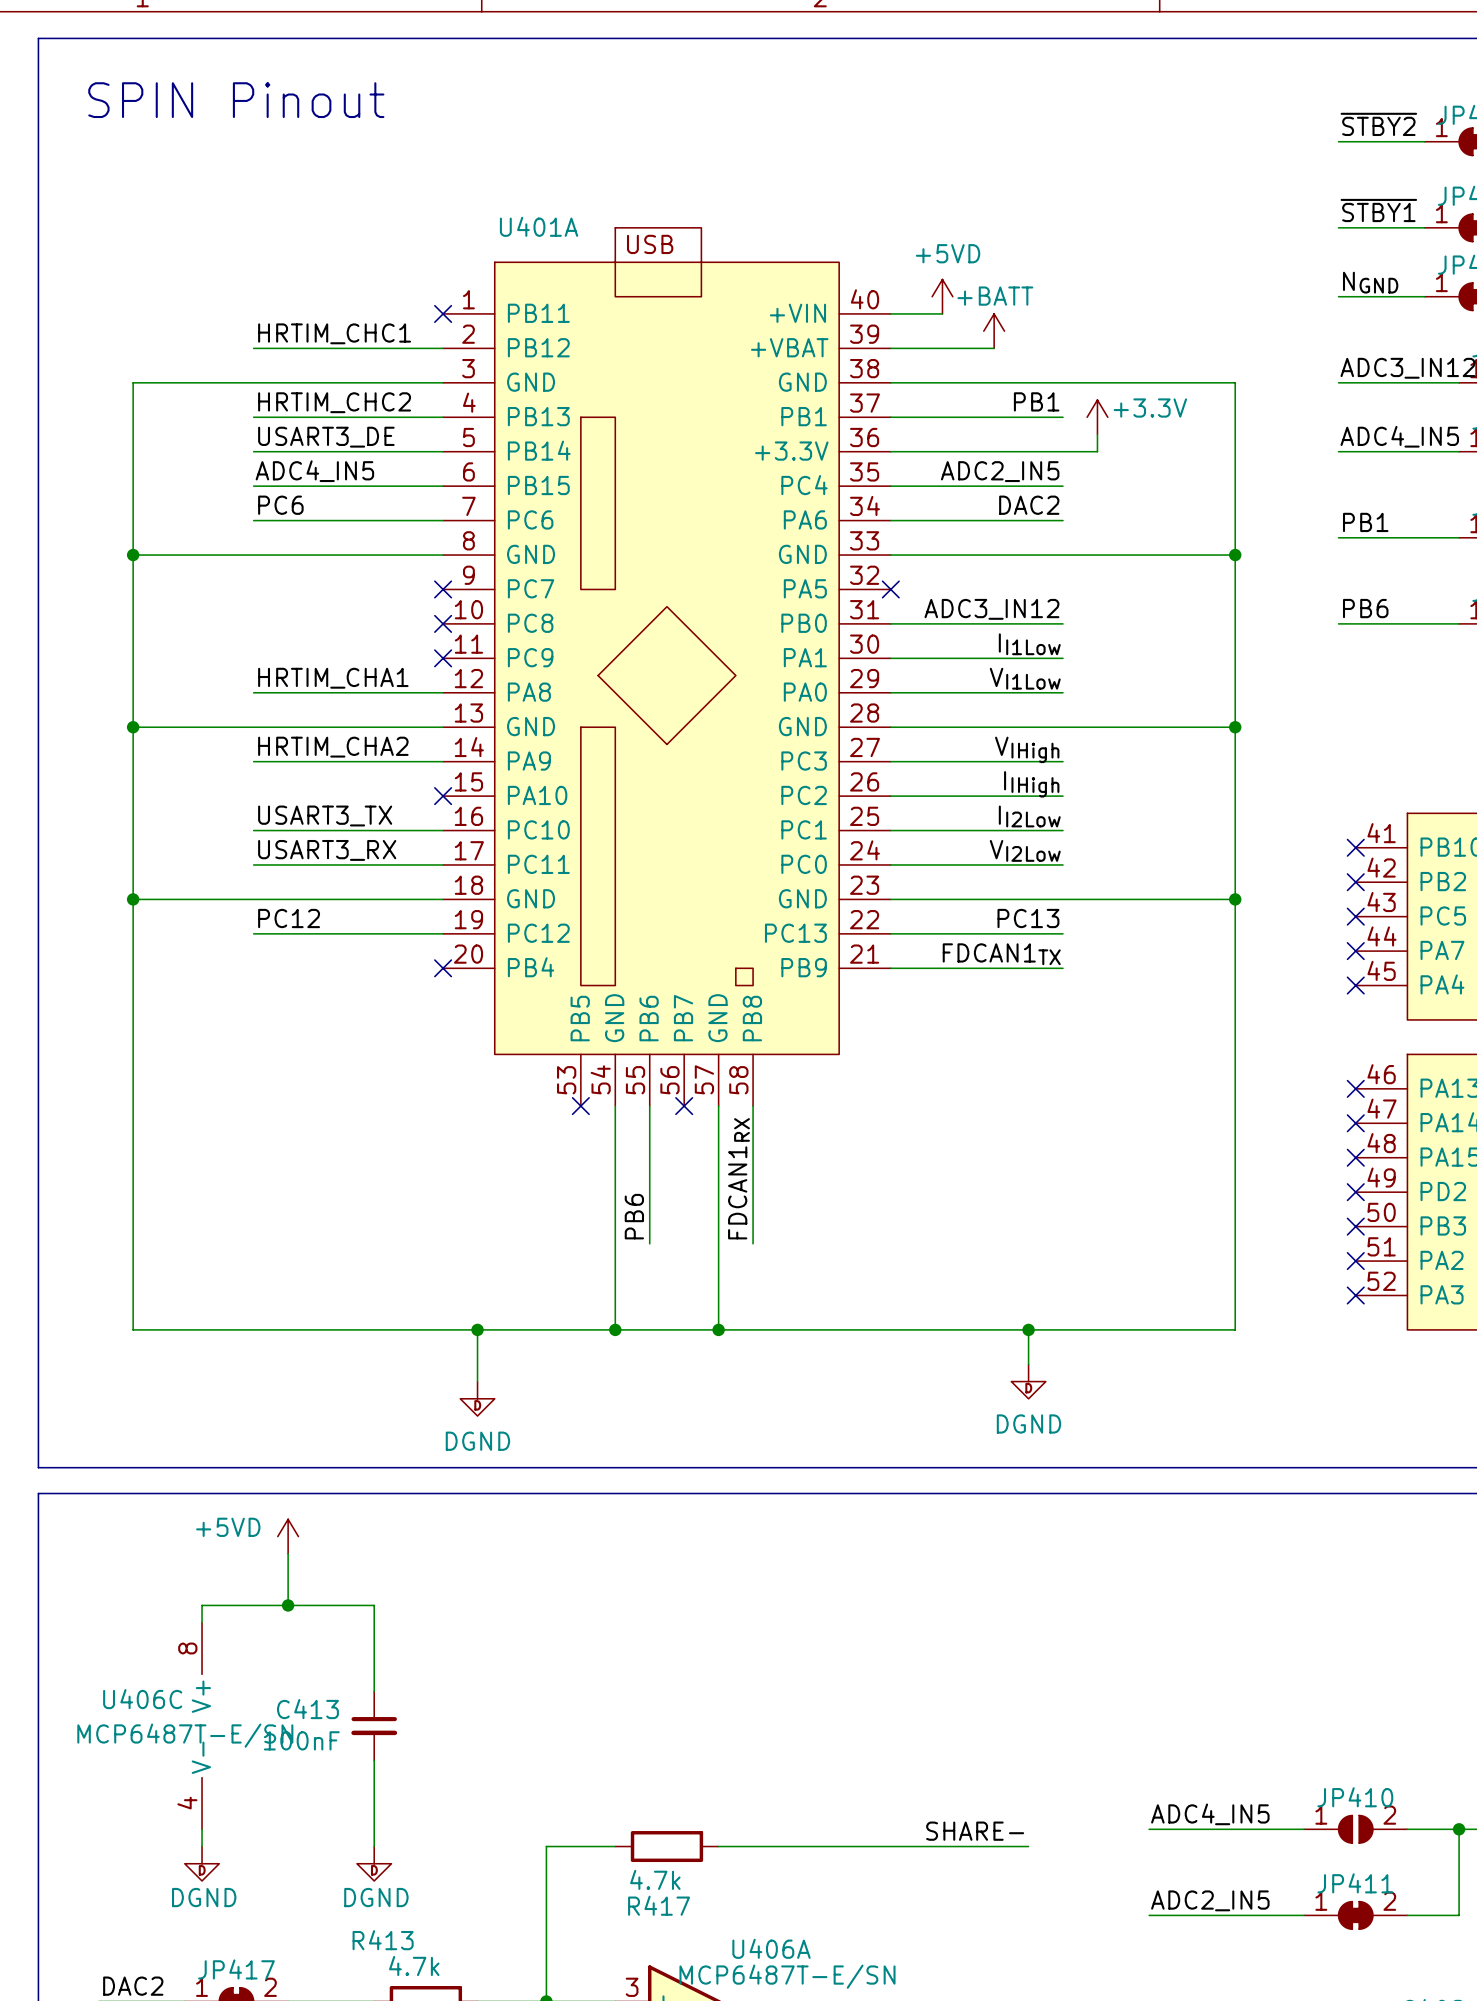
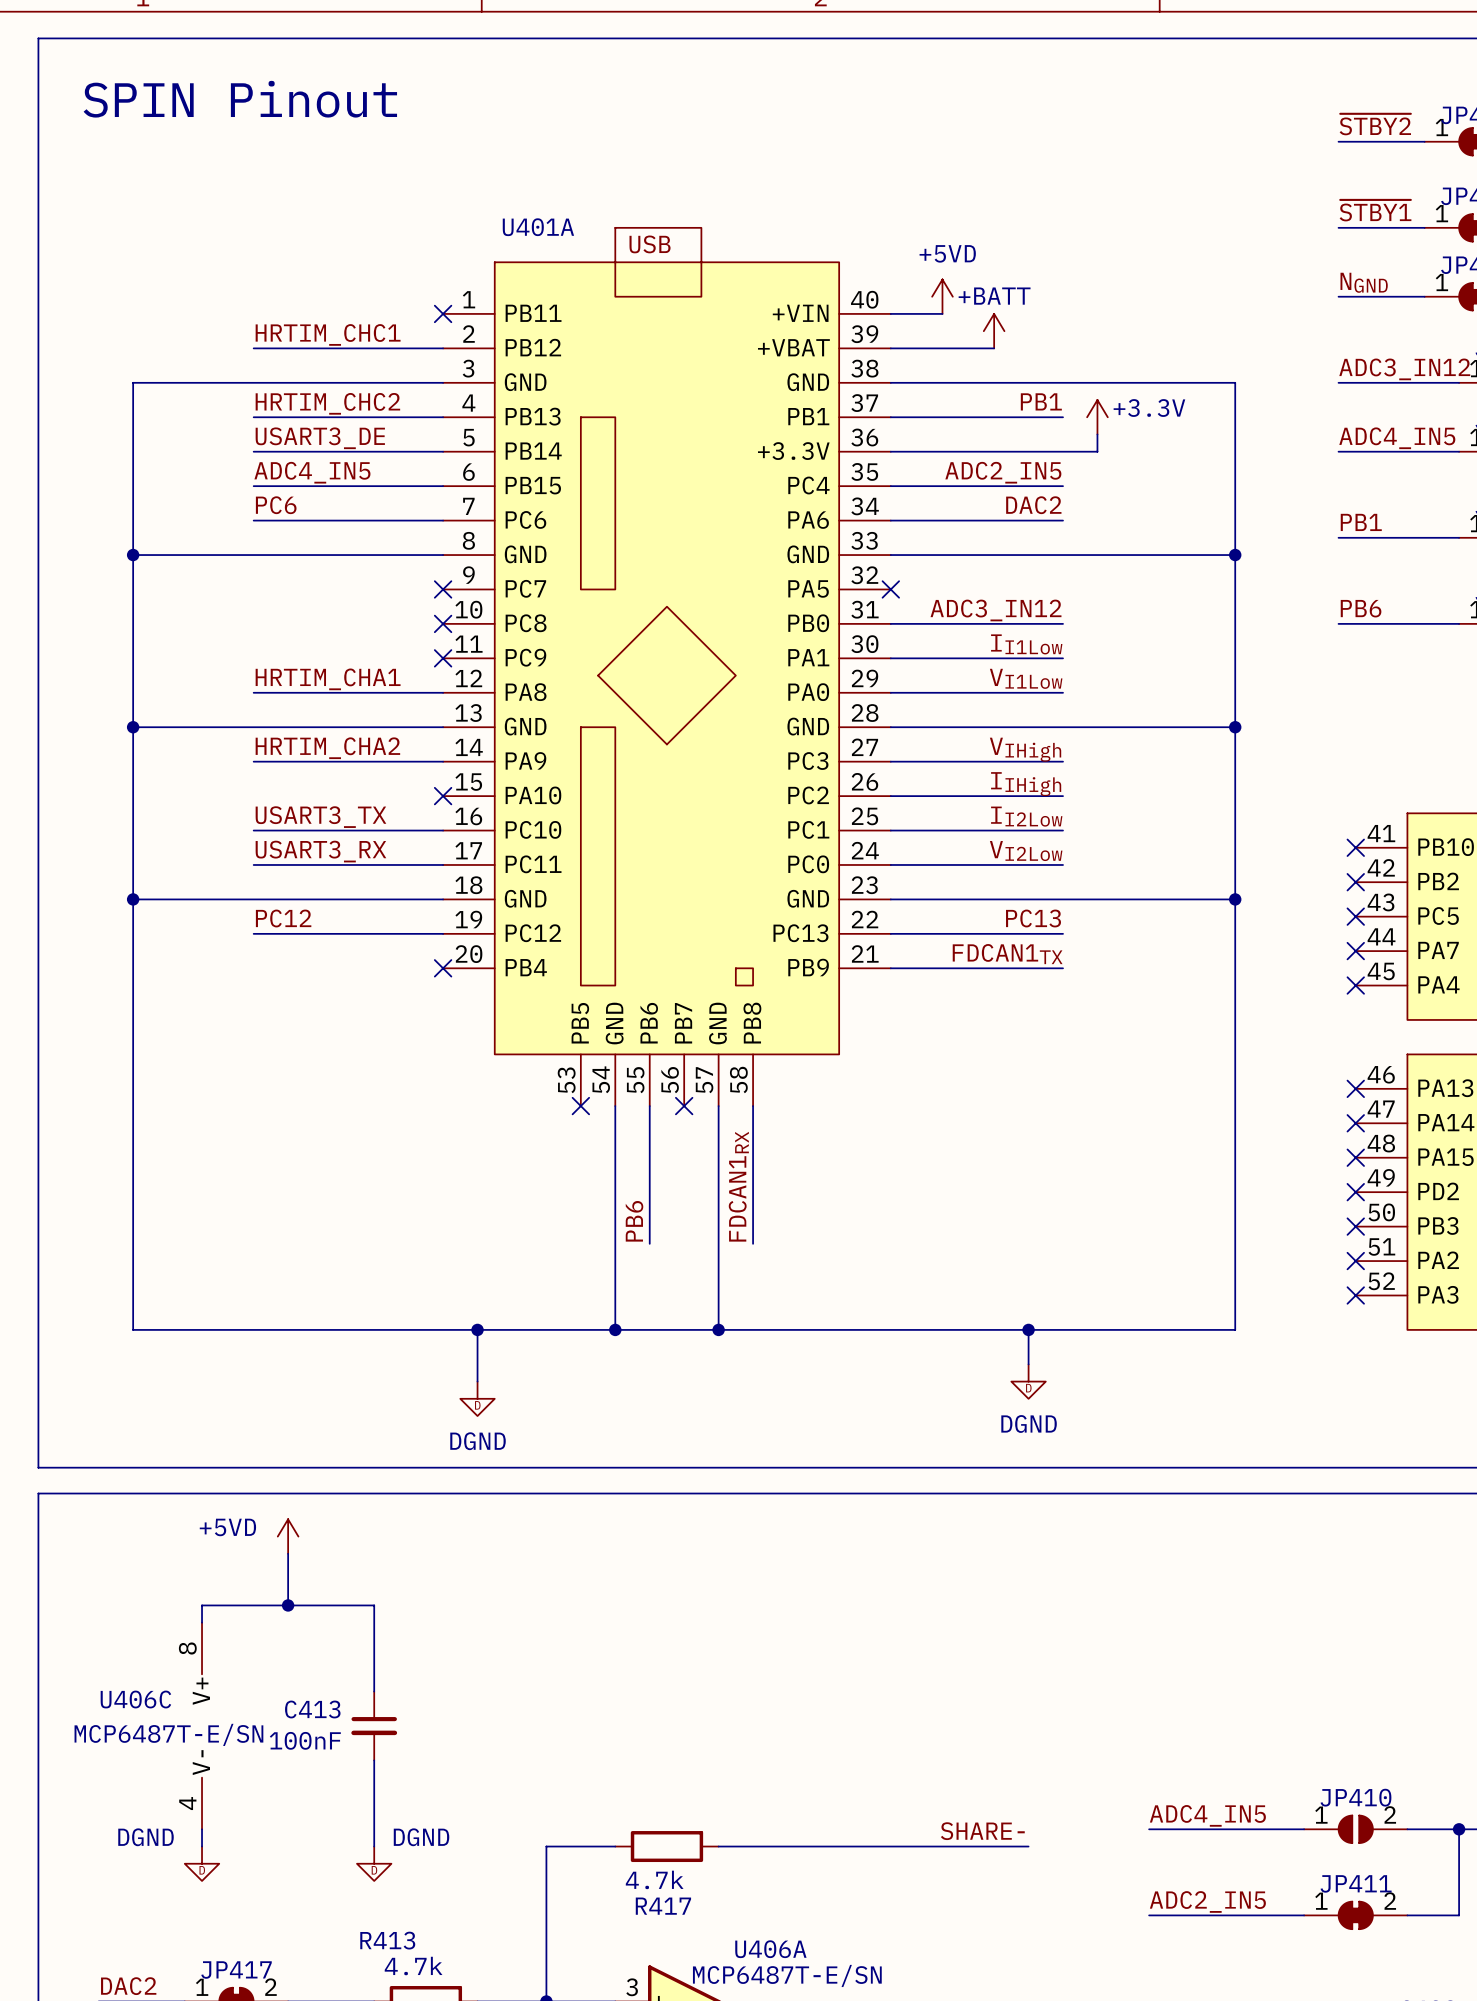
power symbol text position: DGND (204, 1897) -> DGND (146, 1837)
power symbol text position: DGND (376, 1897) -> DGND (421, 1837)

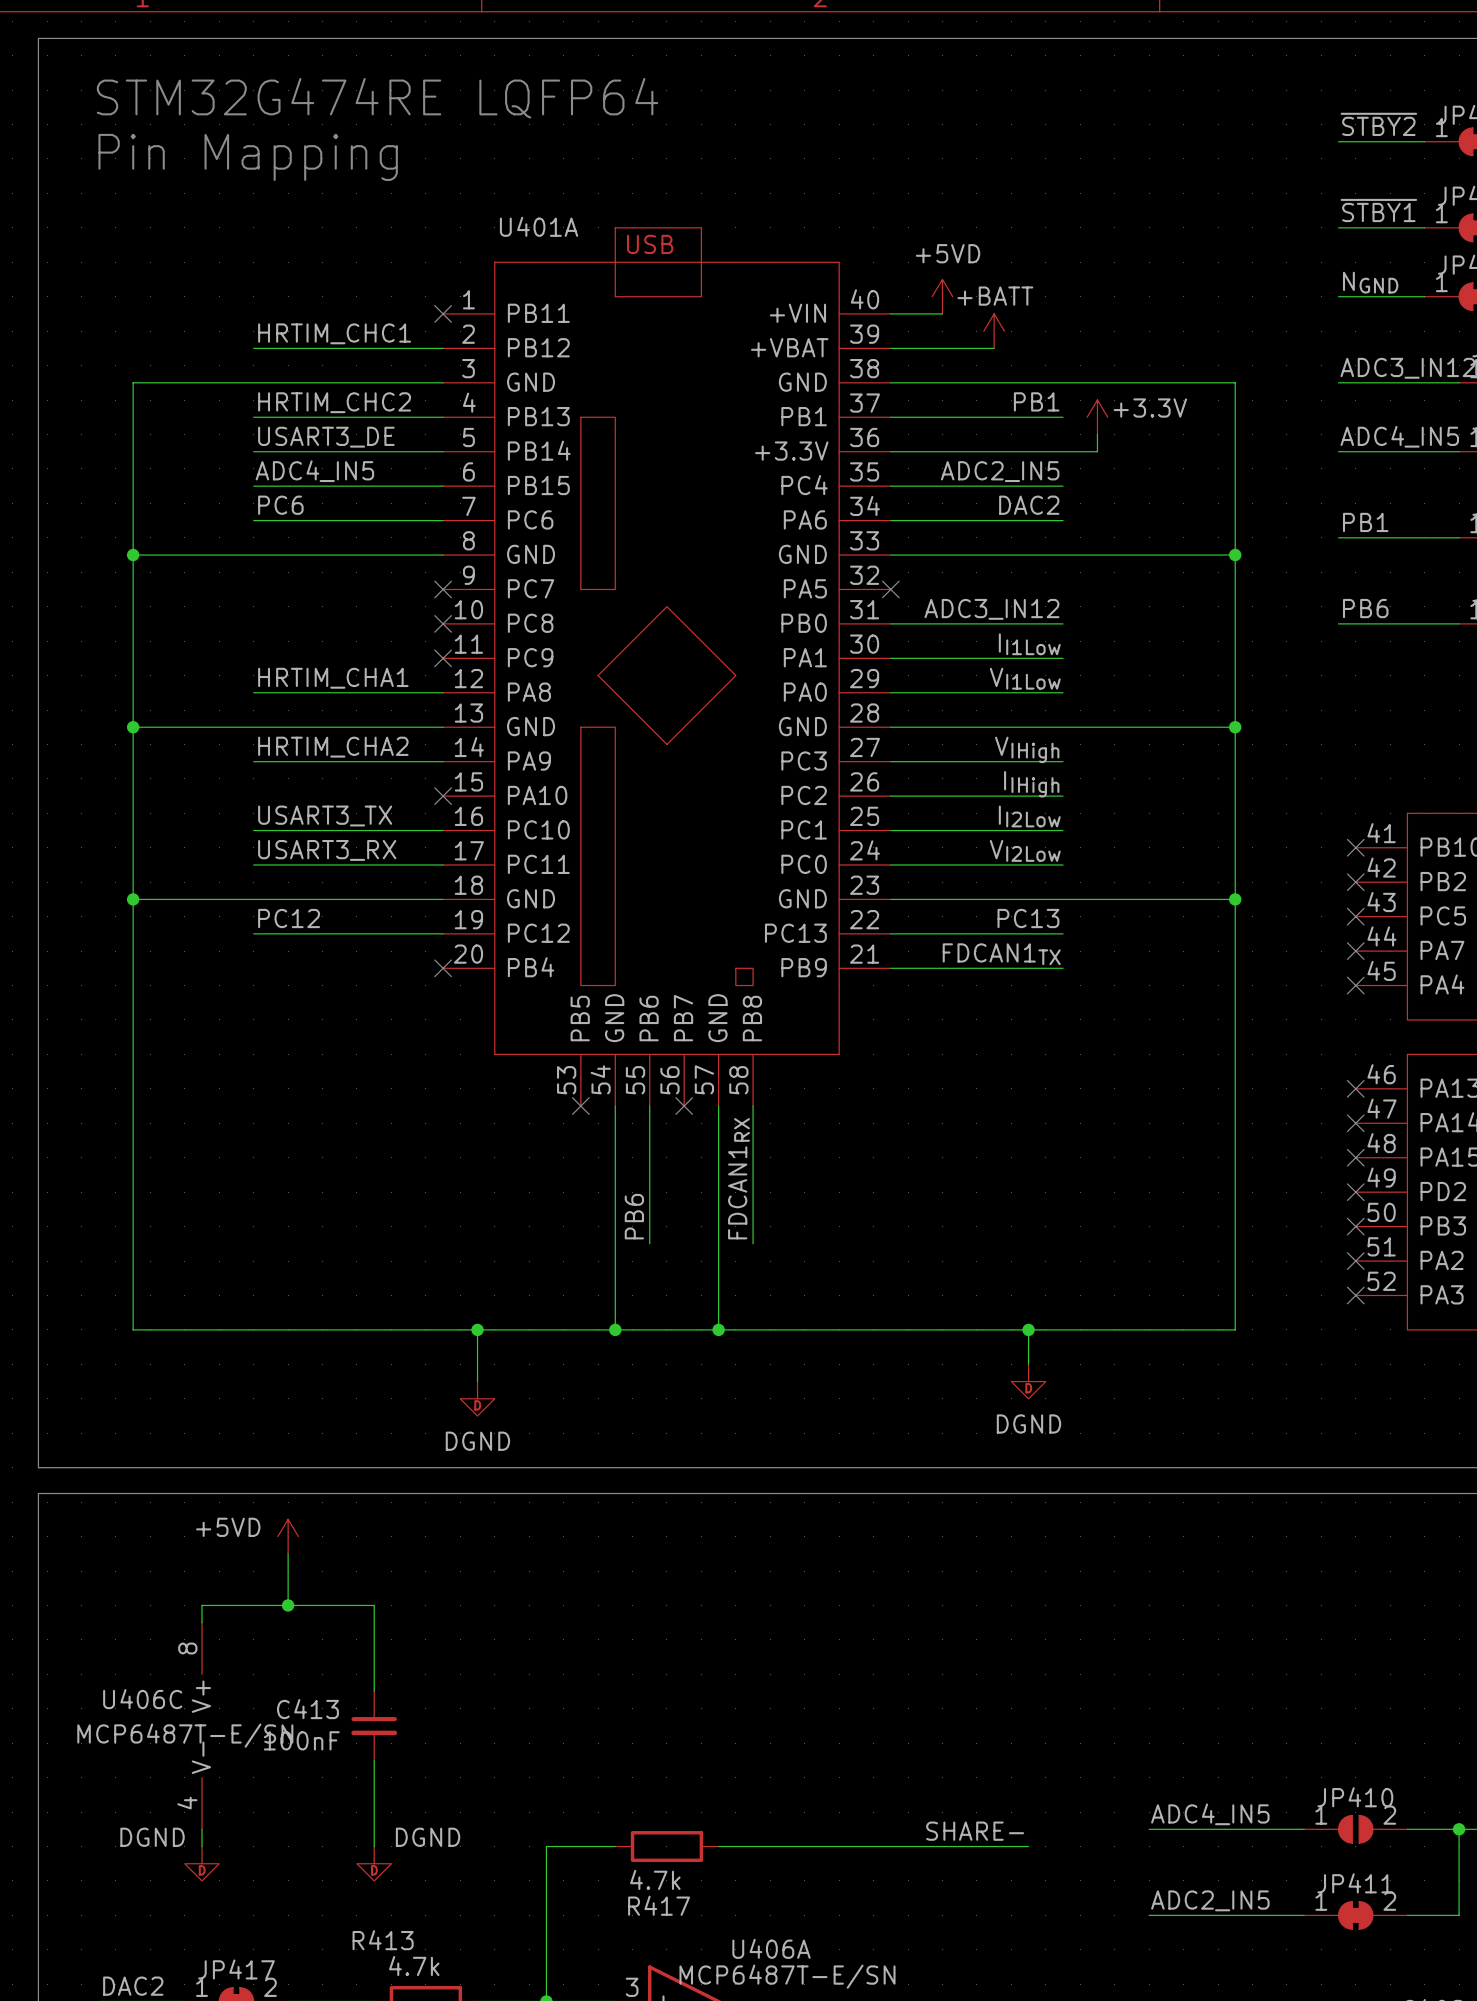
text: SPIN Pinout (240, 99) -> STM32G474RE LQFP64 (377, 98)
text: none -> Pin Mapping (248, 157)

